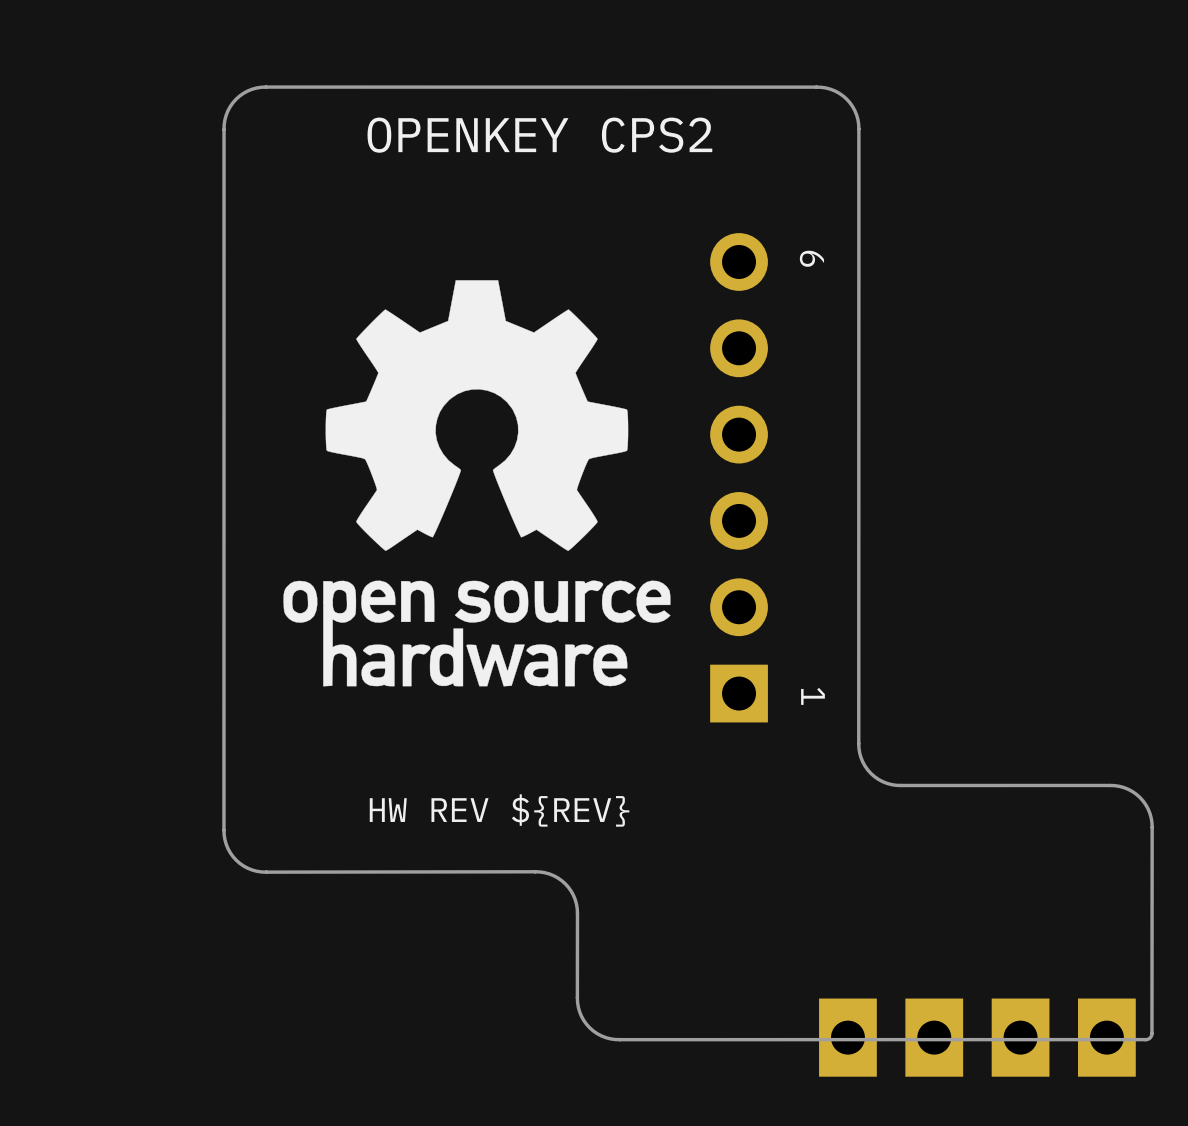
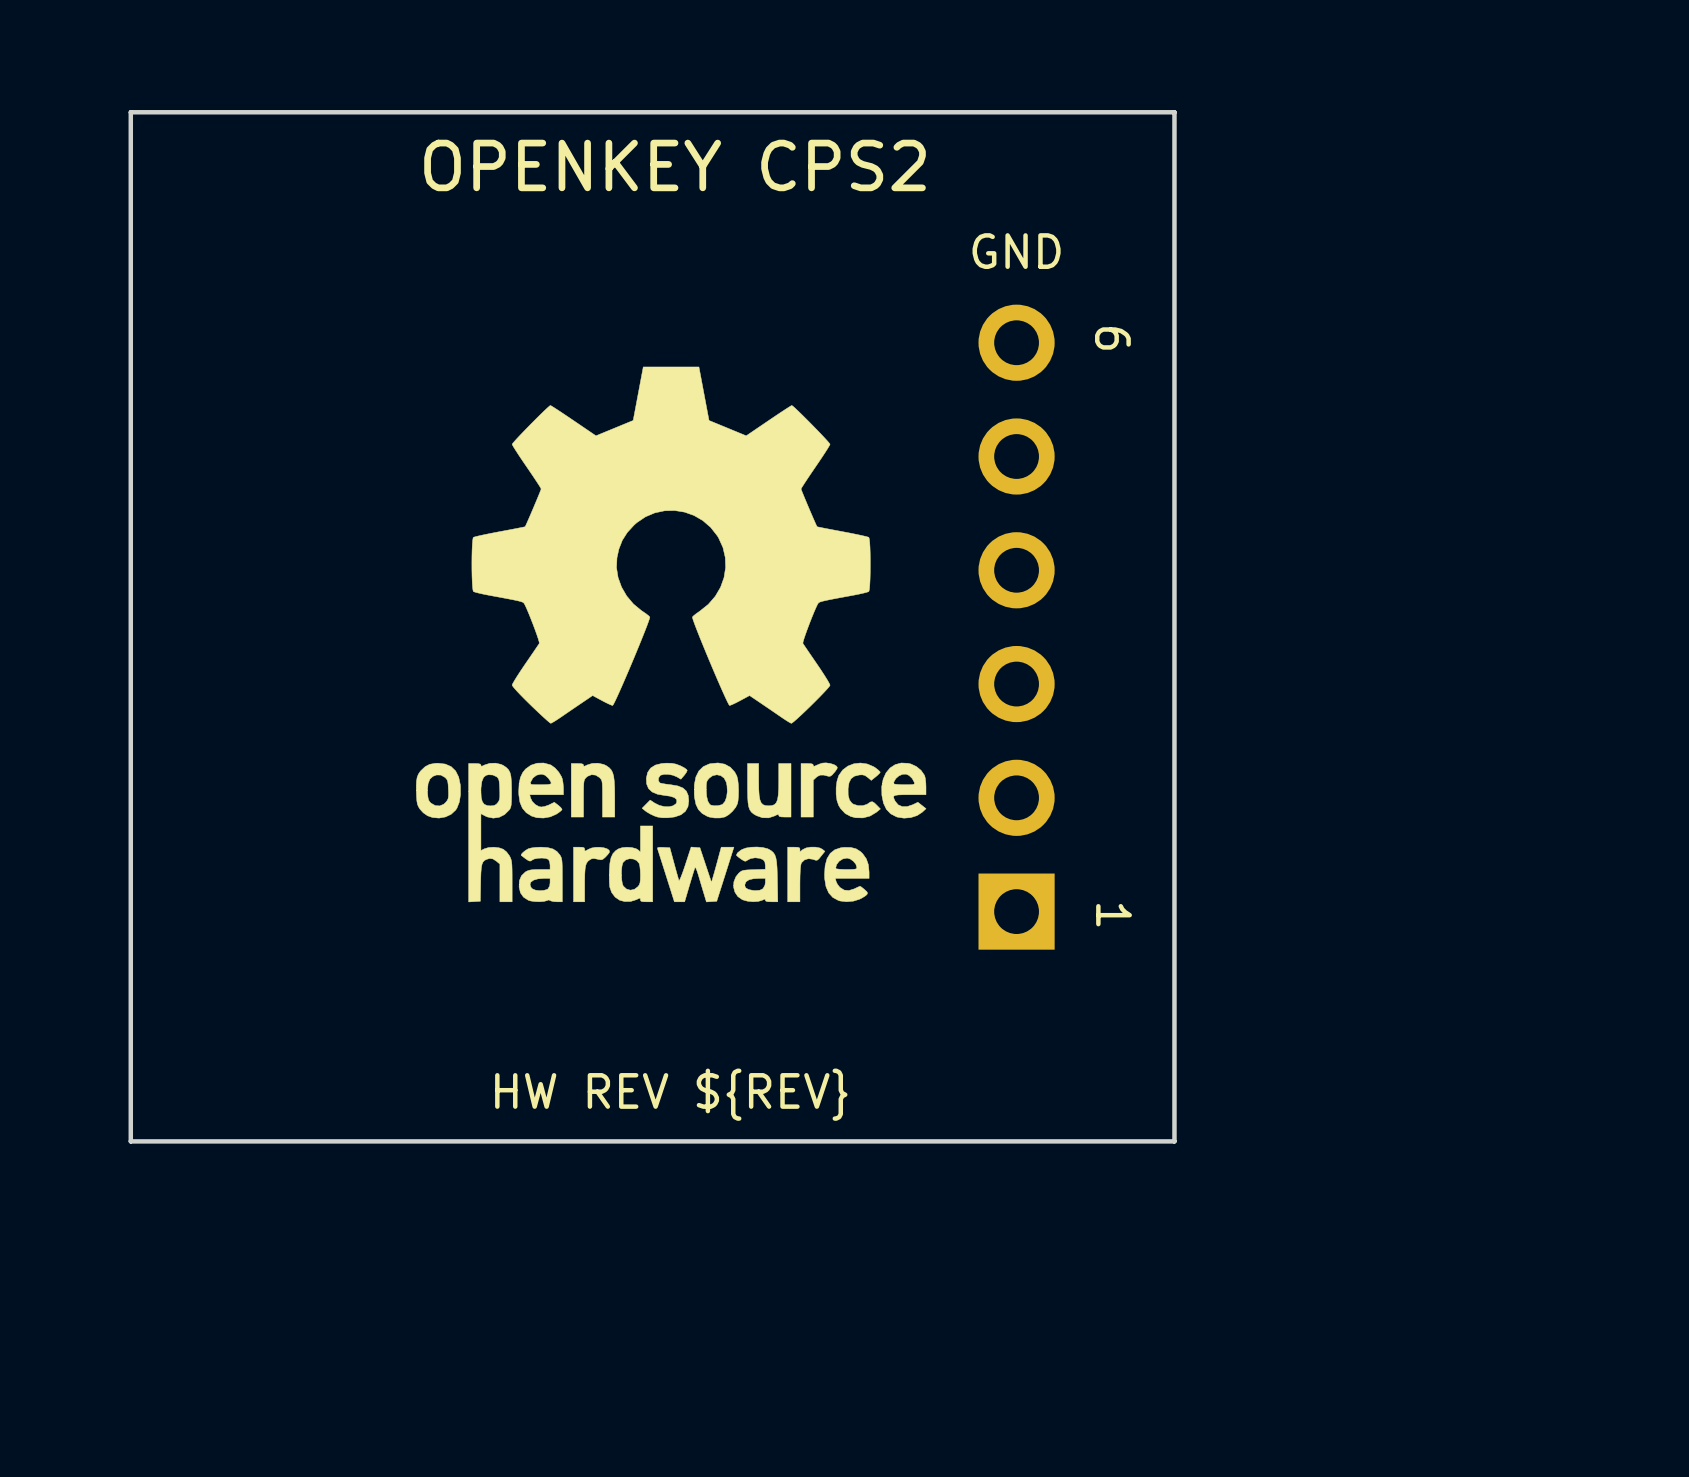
board edge: (816, 87) (265, 87) (247, 91) (232, 102) (226, 115) (224, 129) (223, 830) (226, 844) (233, 856) (239, 863) (247, 868) (261, 871) (534, 871) (553, 875) (568, 887) (576, 904) (577, 997) (579, 1011) (586, 1024) (593, 1030) (610, 1038) (1147, 1039) (1151, 1033) (1152, 827) (1148, 808) (1139, 797) (1128, 789) (1114, 785) (896, 785) (882, 781) (874, 776) (867, 770) (860, 757) (858, 743) (858, 124) (854, 110) (846, 99) (834, 90) (816, 87) -> none
board edge: none -> (1174, 112) (130, 112) (130, 1141) (1174, 1141) (1174, 112)
text position: OPENKEY CPS2 (539, 135) -> OPENKEY CPS2 (675, 165)
text: none -> GND (1016, 251)
text position: HW REV ${REV} (499, 810) -> HW REV ${REV} (671, 1094)
part: (977, 1037) -> none

